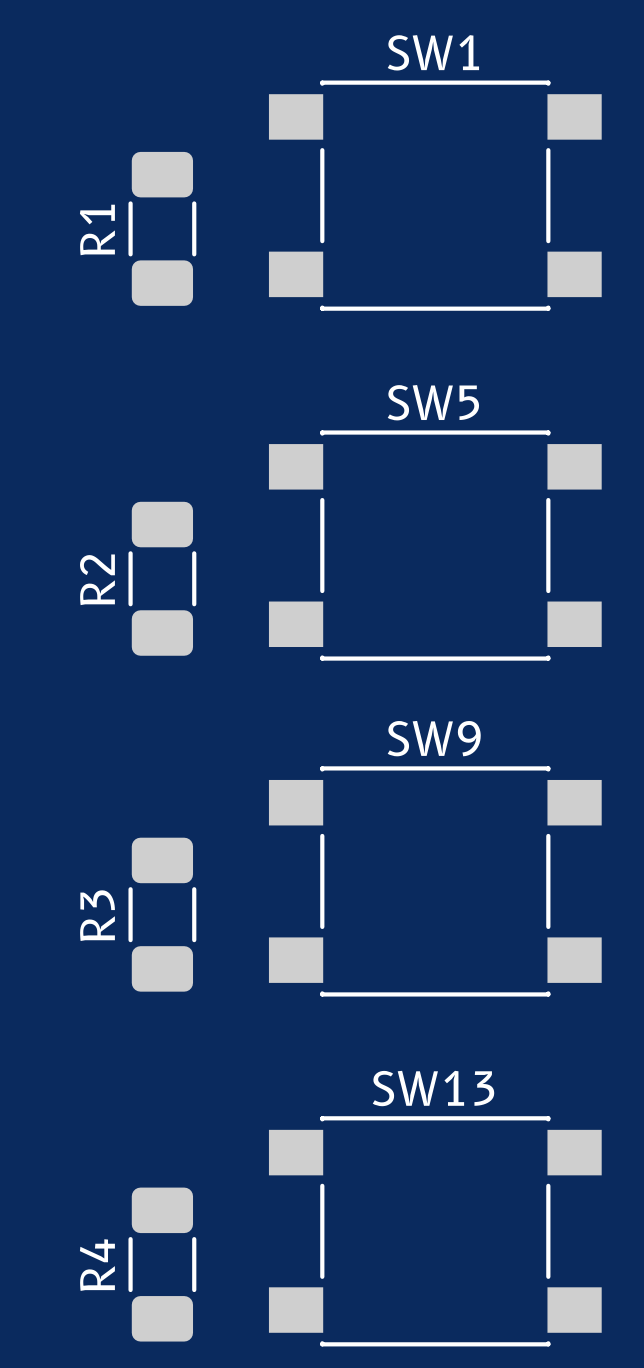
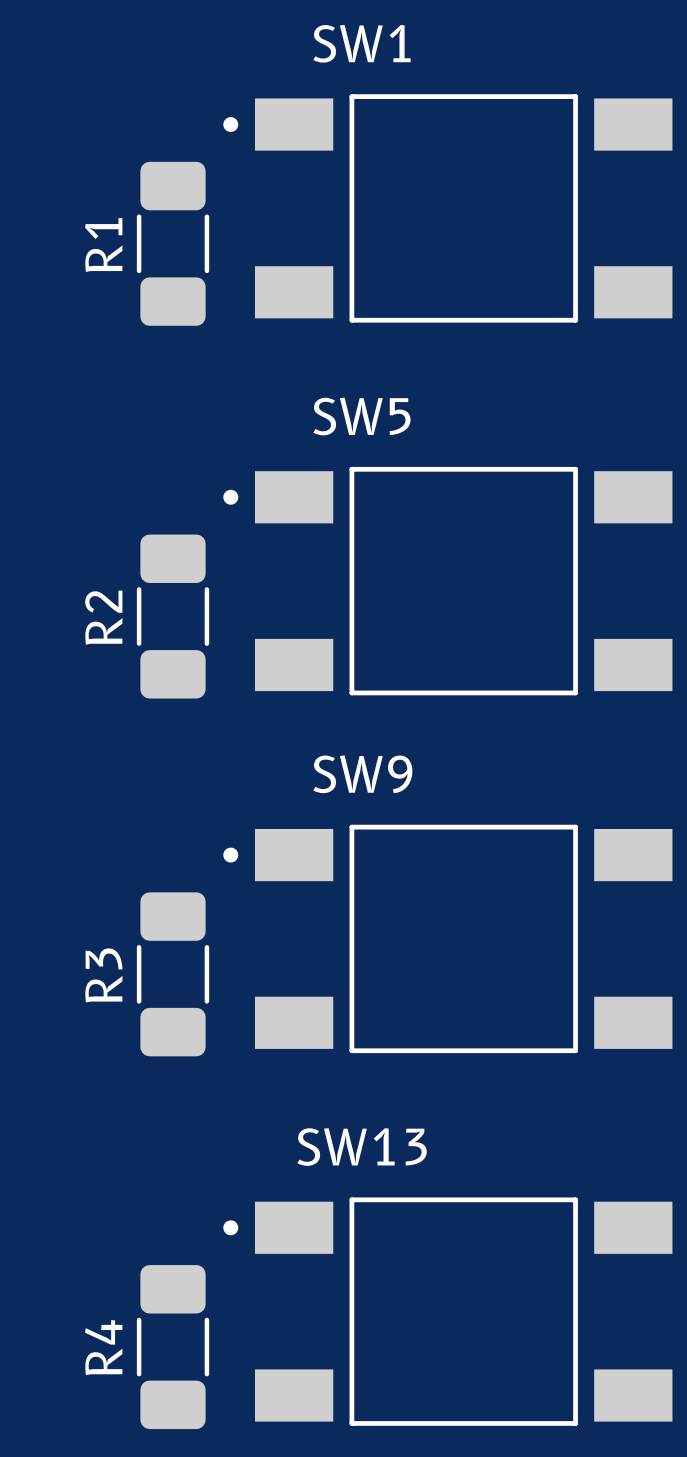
SW1 name position: SW1 (433, 52) -> SW1 (361, 43)
SW1 footprint: [268, 80, 602, 311] -> [223, 94, 673, 323]
SW5 name position: SW5 (433, 402) -> SW5 (361, 416)
SW5 footprint: [268, 430, 602, 661] -> [223, 466, 673, 696]
SW9 name position: SW9 (434, 738) -> SW9 (362, 774)
SW9 footprint: [268, 766, 602, 997] -> [223, 824, 673, 1054]
SW13 name position: SW13 (433, 1088) -> SW13 (362, 1147)
SW13 footprint: [268, 1116, 602, 1347] -> [223, 1197, 673, 1426]

